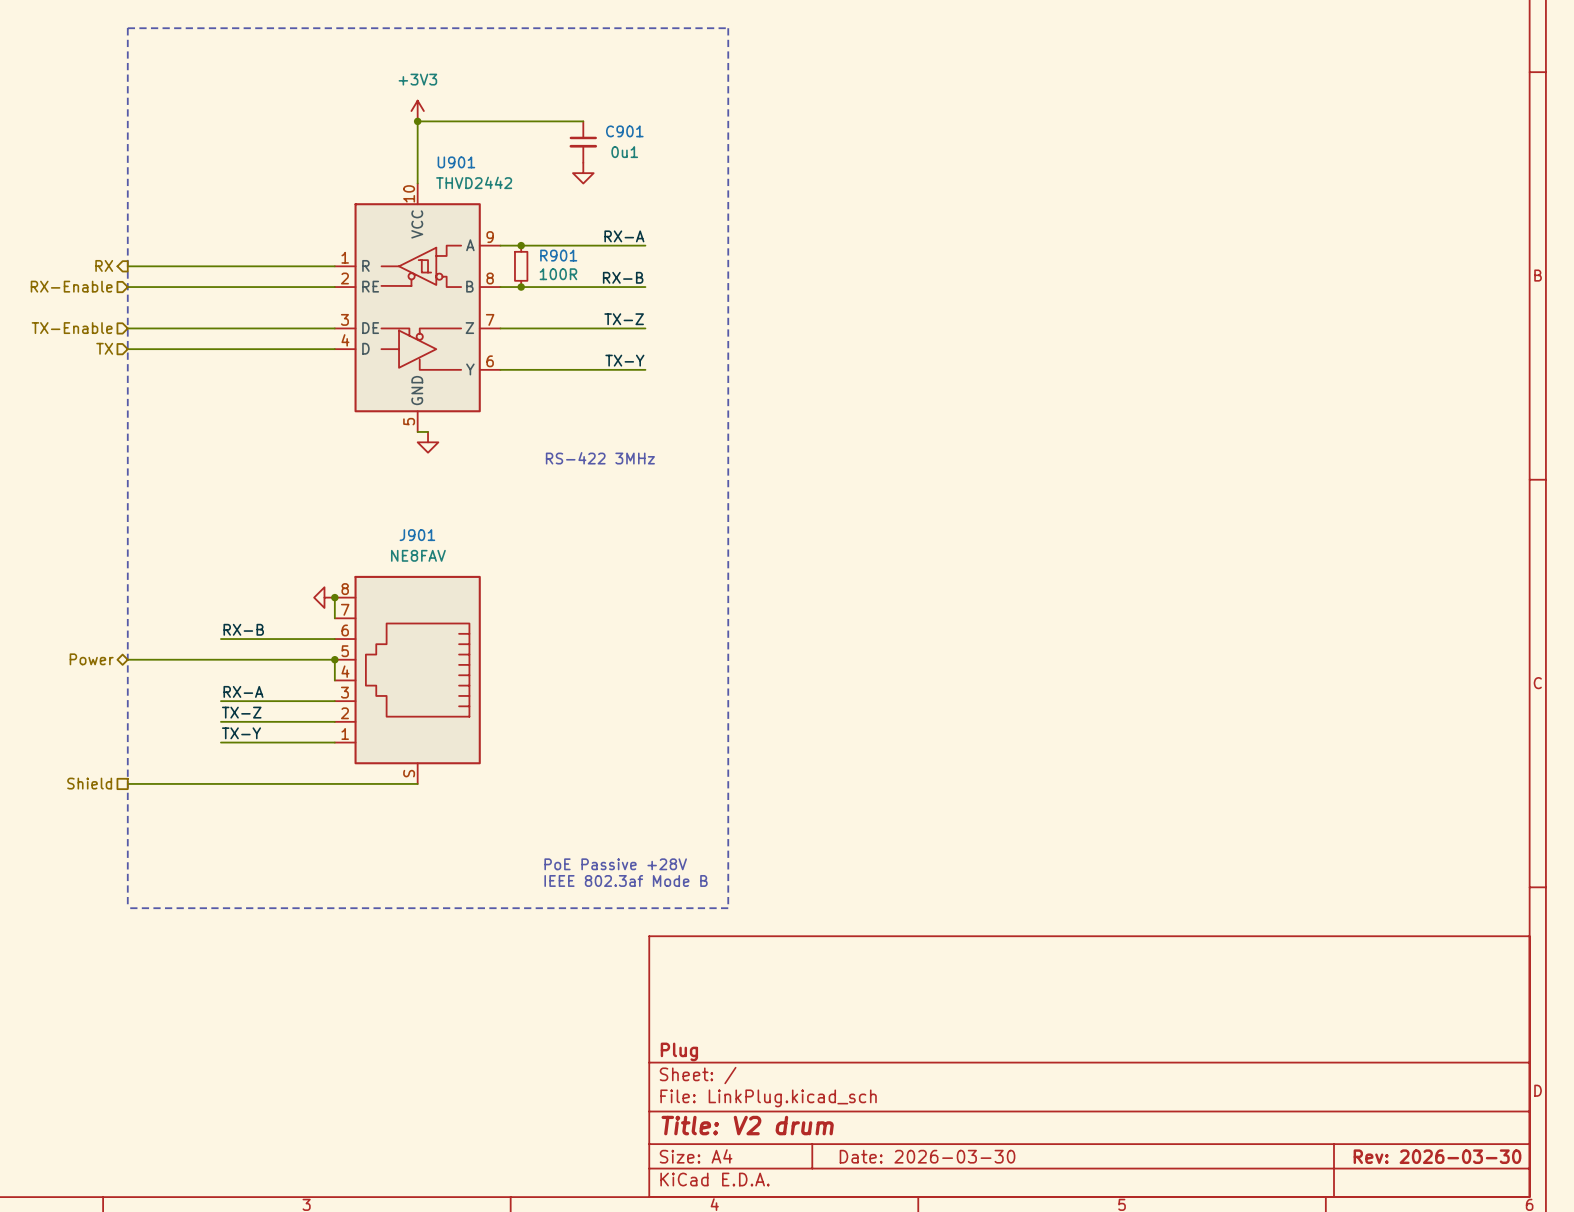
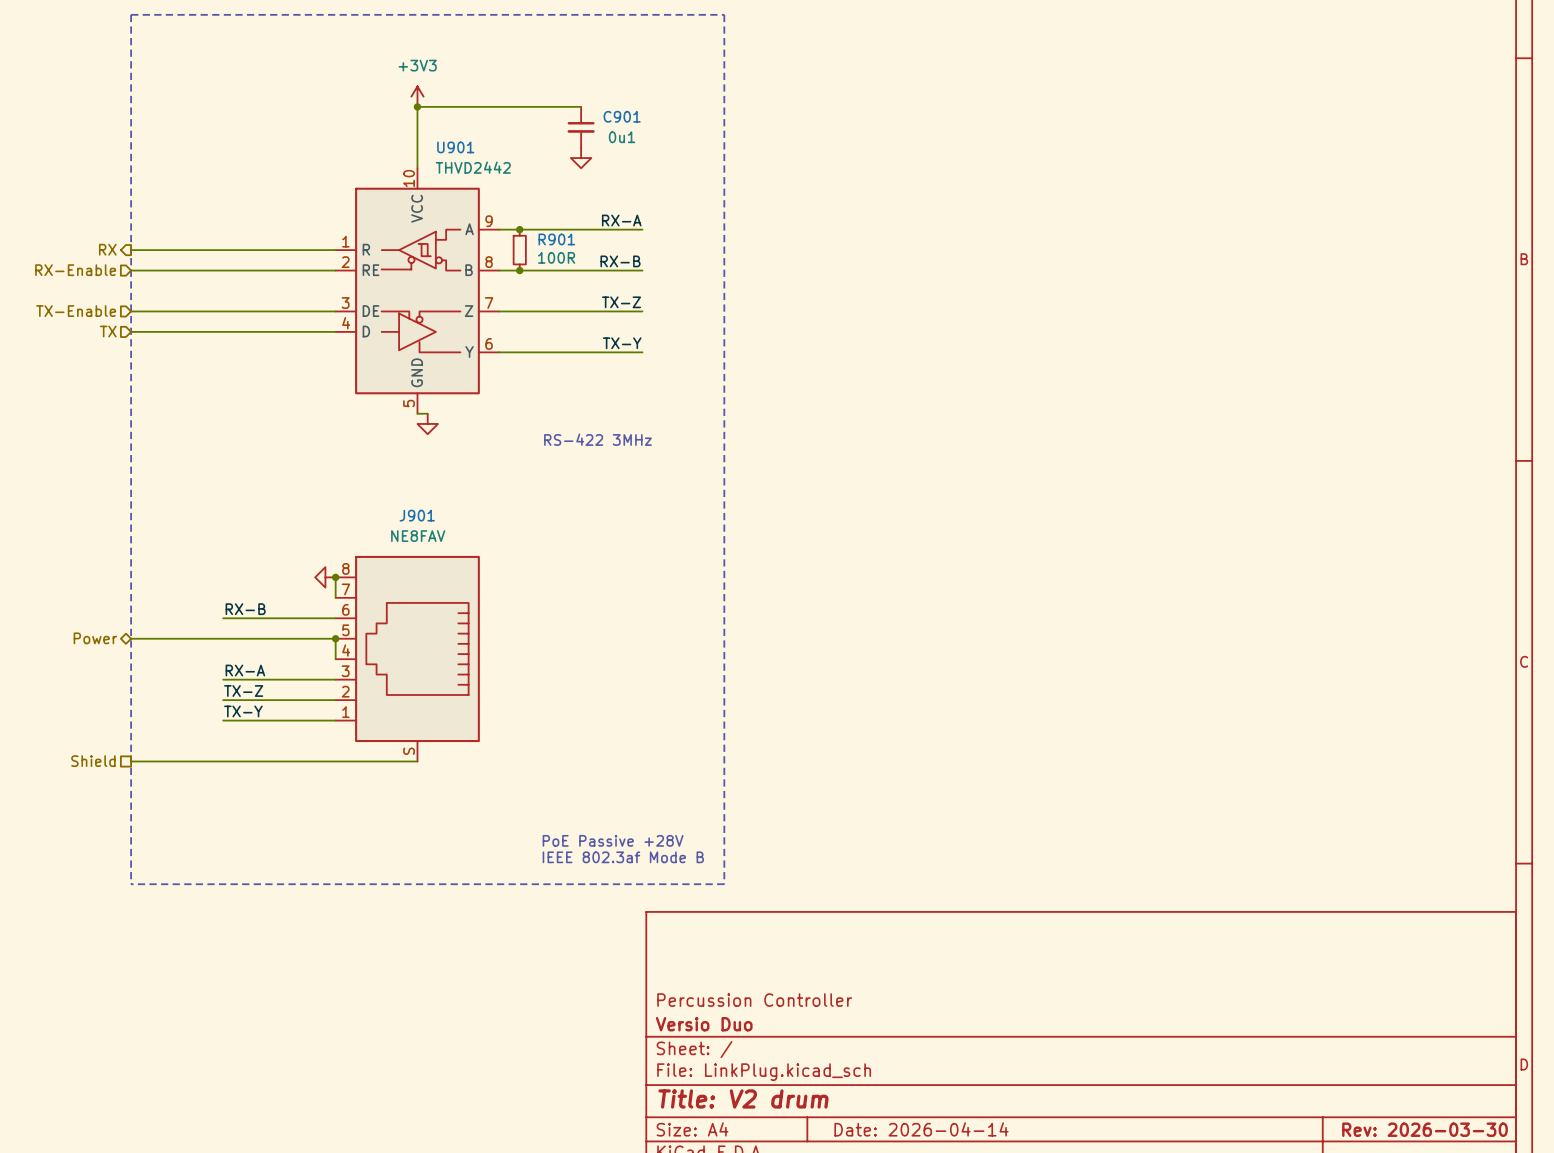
title block: none -> Percussion Controller (754, 1000)
title block: Plug (679, 1051) -> Versio Duo (704, 1024)
title block: Date: 2026-03-30 (927, 1156) -> Date: 2026-04-14 (921, 1129)

